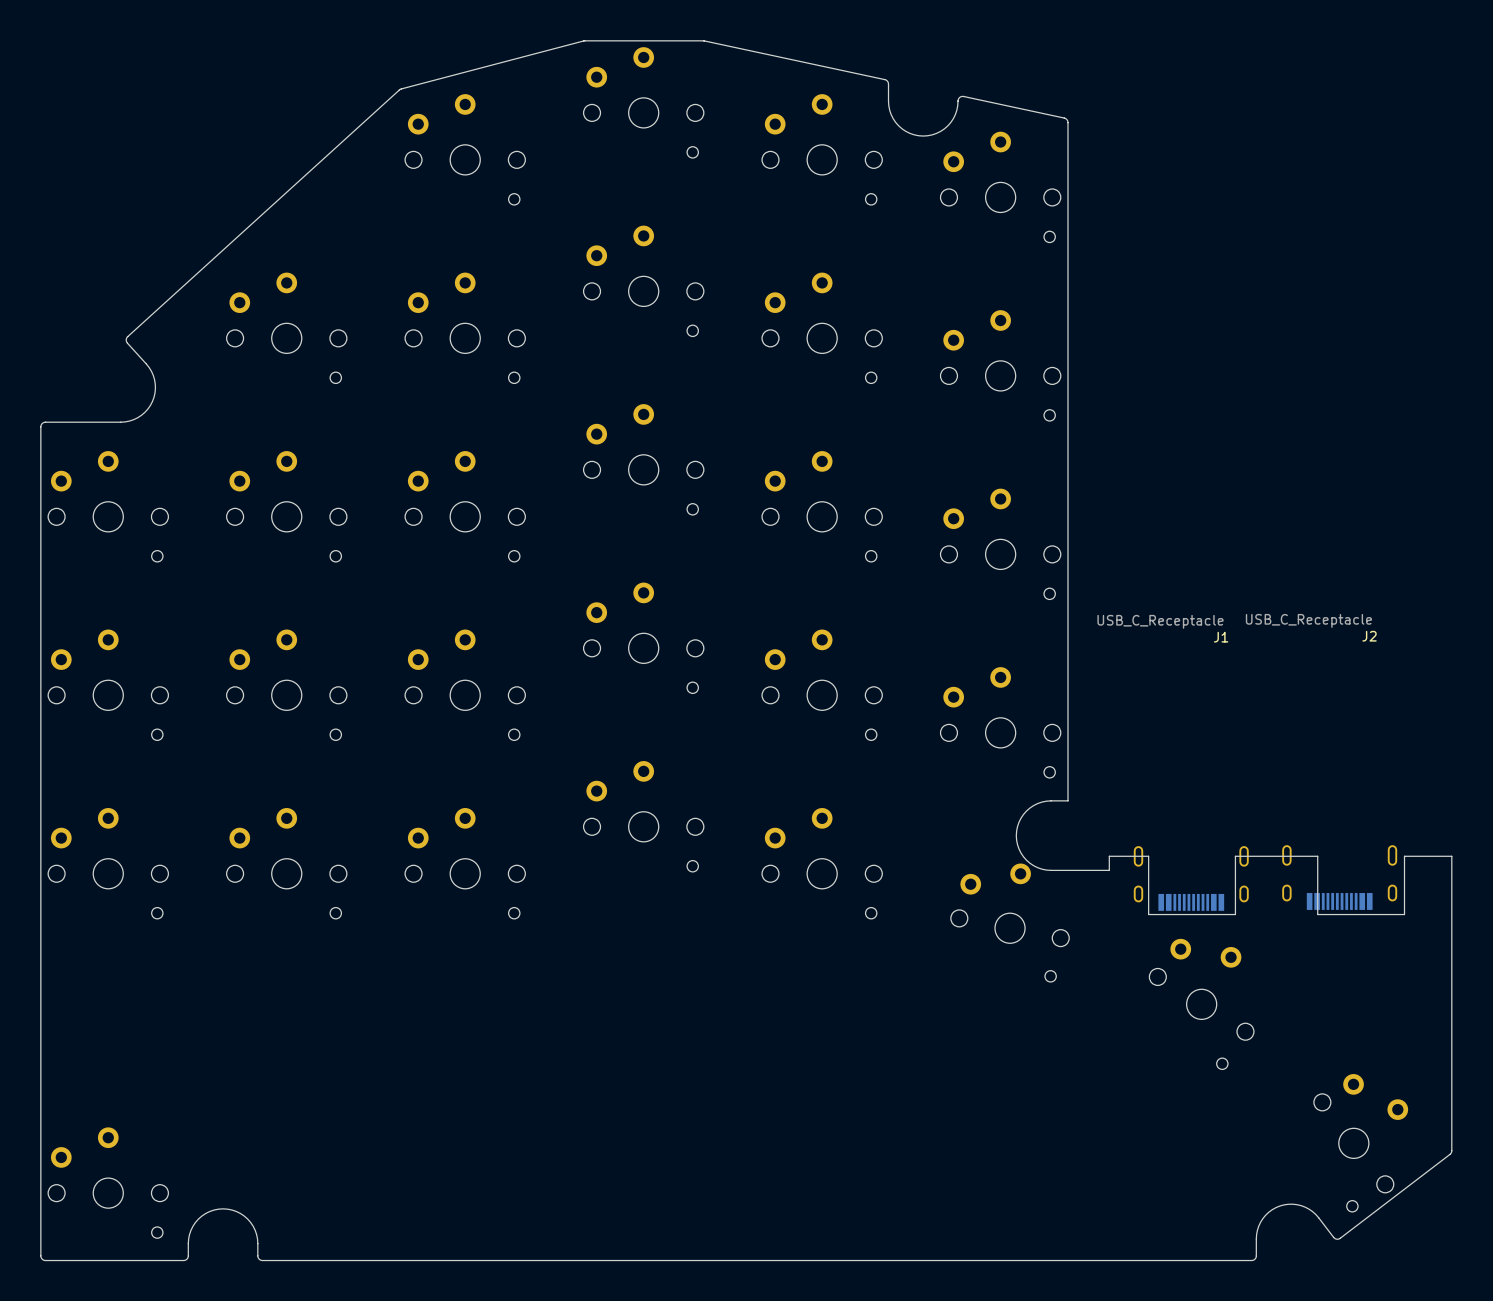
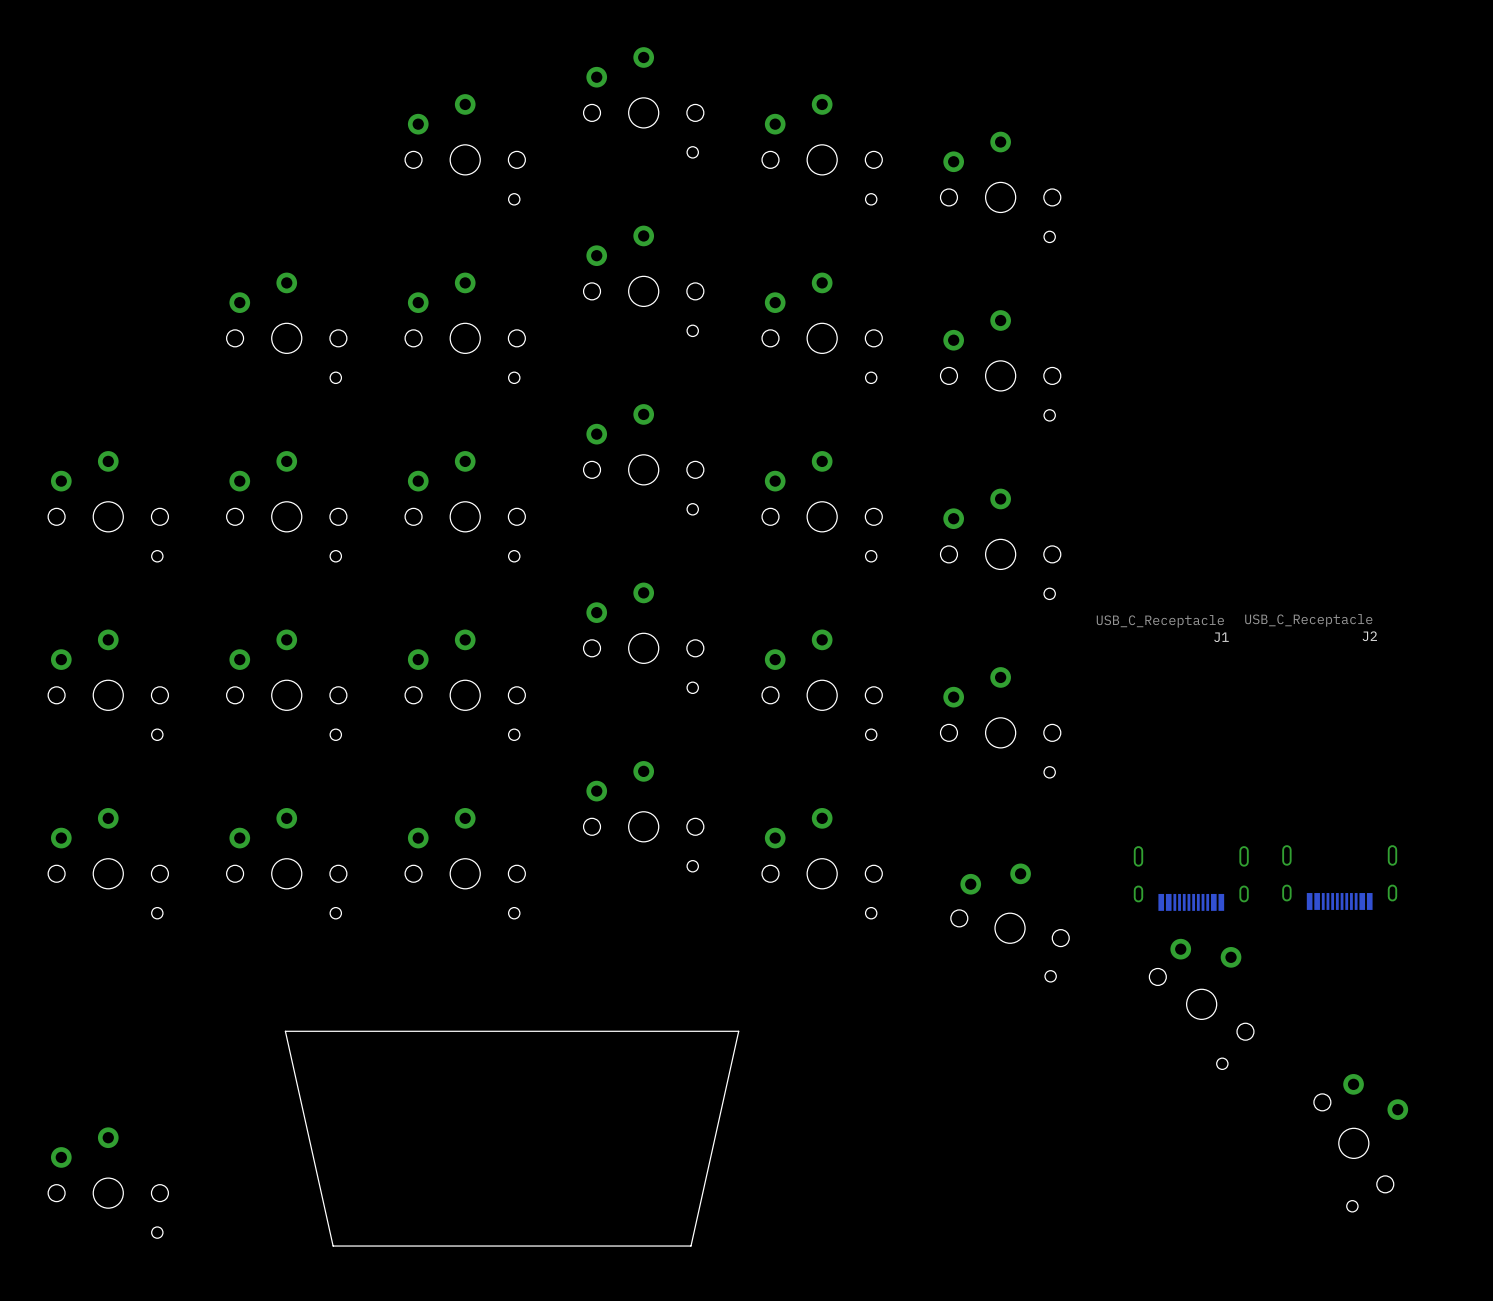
board edge: (958, 101) (959, 97) (963, 96) (1064, 118) (1067, 122) (1067, 800) (1042, 802) (1026, 811) (1017, 826) (1016, 840) (1018, 848) (1029, 863) (1042, 869) (1051, 870) (1109, 870) (1109, 856) (1148, 856) (1148, 914) (1235, 914) (1235, 856) (1317, 856) (1317, 914) (1404, 914) (1404, 856) (1451, 856) (1450, 1153) (1338, 1239) (1334, 1237) (1315, 1214) (1305, 1207) (1292, 1204) (1275, 1207) (1265, 1215) (1258, 1226) (1256, 1256) (1252, 1260) (262, 1260) (257, 1257) (256, 1234) (250, 1222) (236, 1211) (223, 1208) (209, 1211) (195, 1222) (189, 1234) (188, 1256) (184, 1260) (42, 1259) (40, 1255) (41, 424) (45, 422) (125, 421) (137, 417) (144, 412) (154, 397) (154, 379) (149, 367) (127, 342) (127, 337) (400, 89) (584, 40) (703, 40) (885, 79) (888, 83) (888, 105) (893, 118) (902, 128) (914, 134) (932, 134) (944, 128) (953, 118) (958, 101) -> none
board edge: none -> (738, 1031) (285, 1031) (333, 1246) (690, 1246) (738, 1031)

